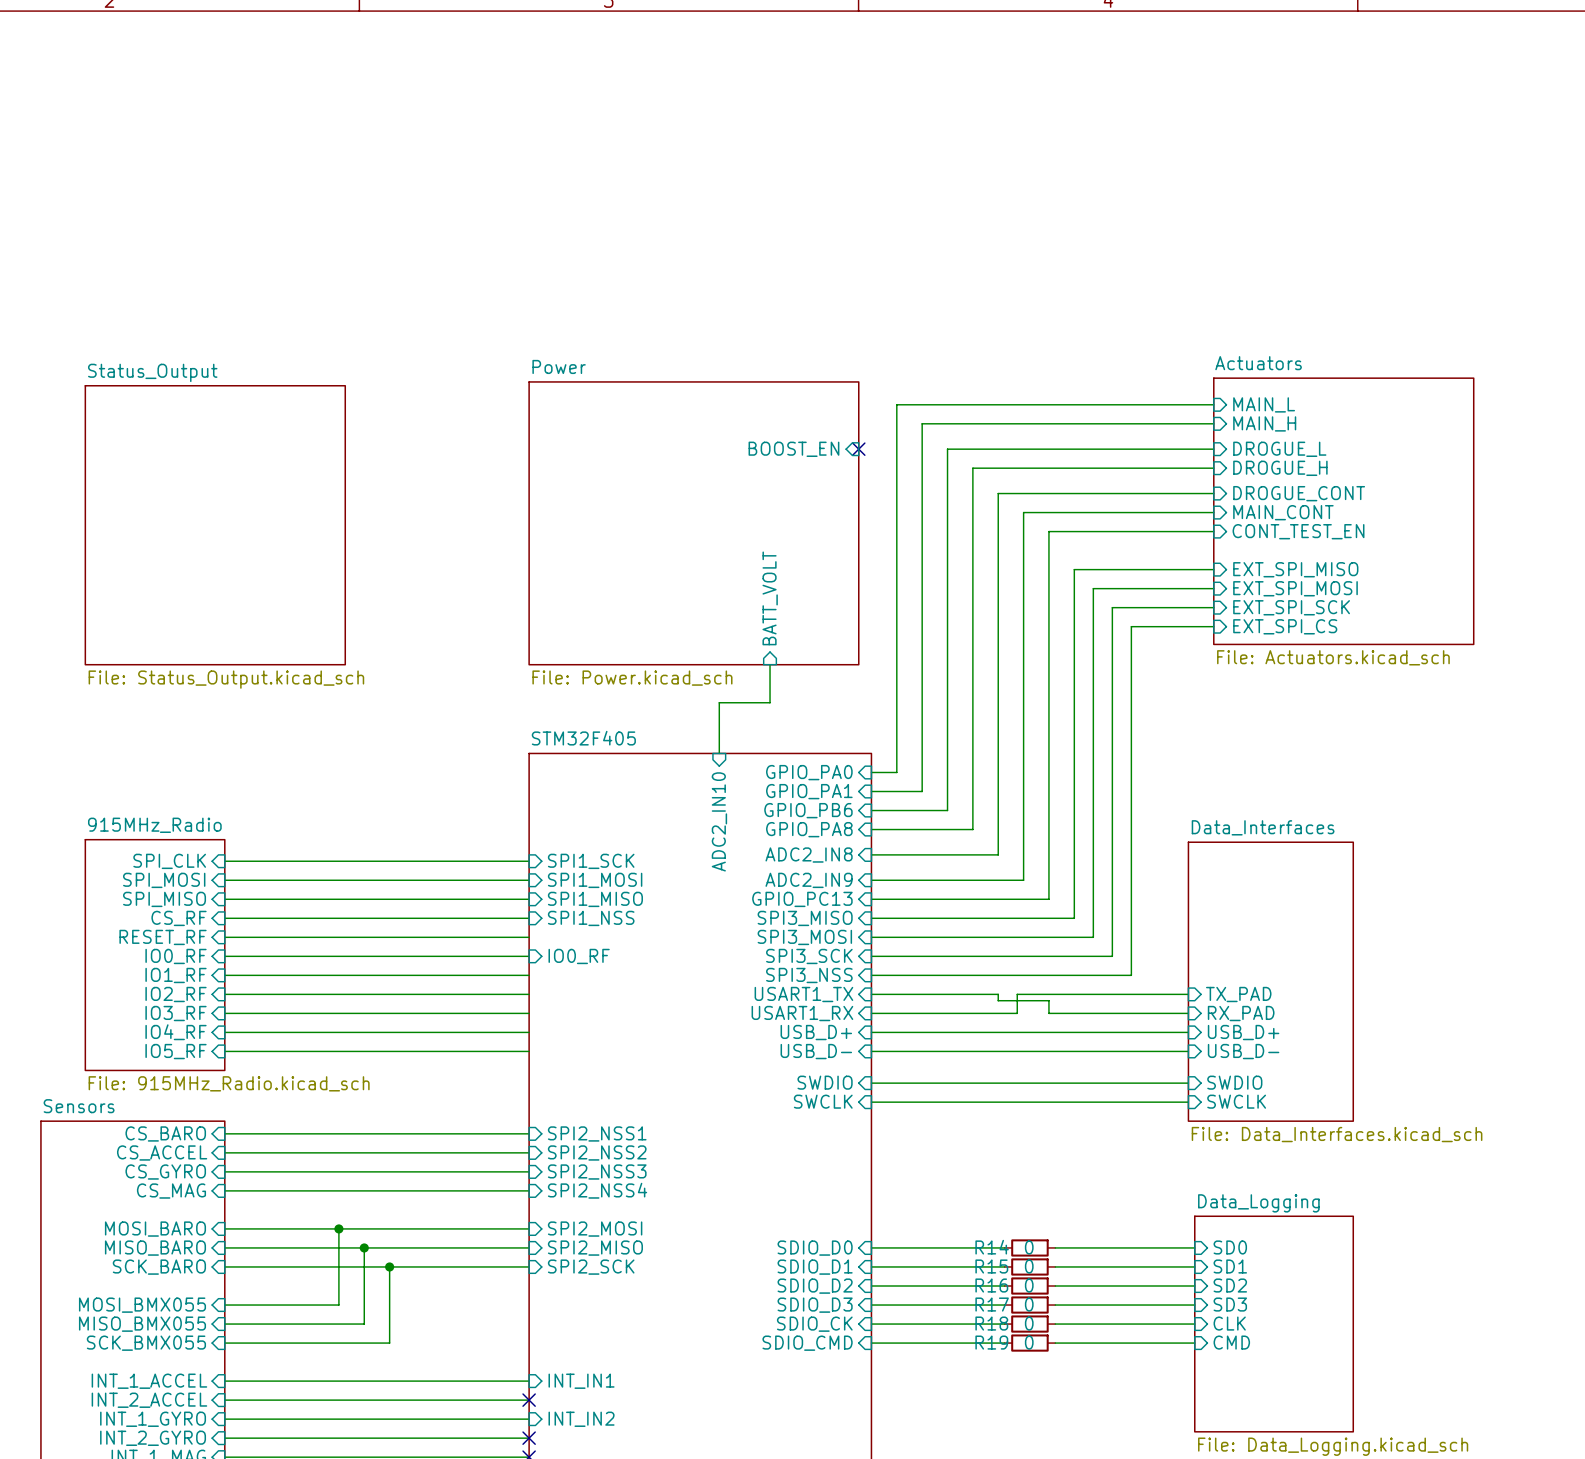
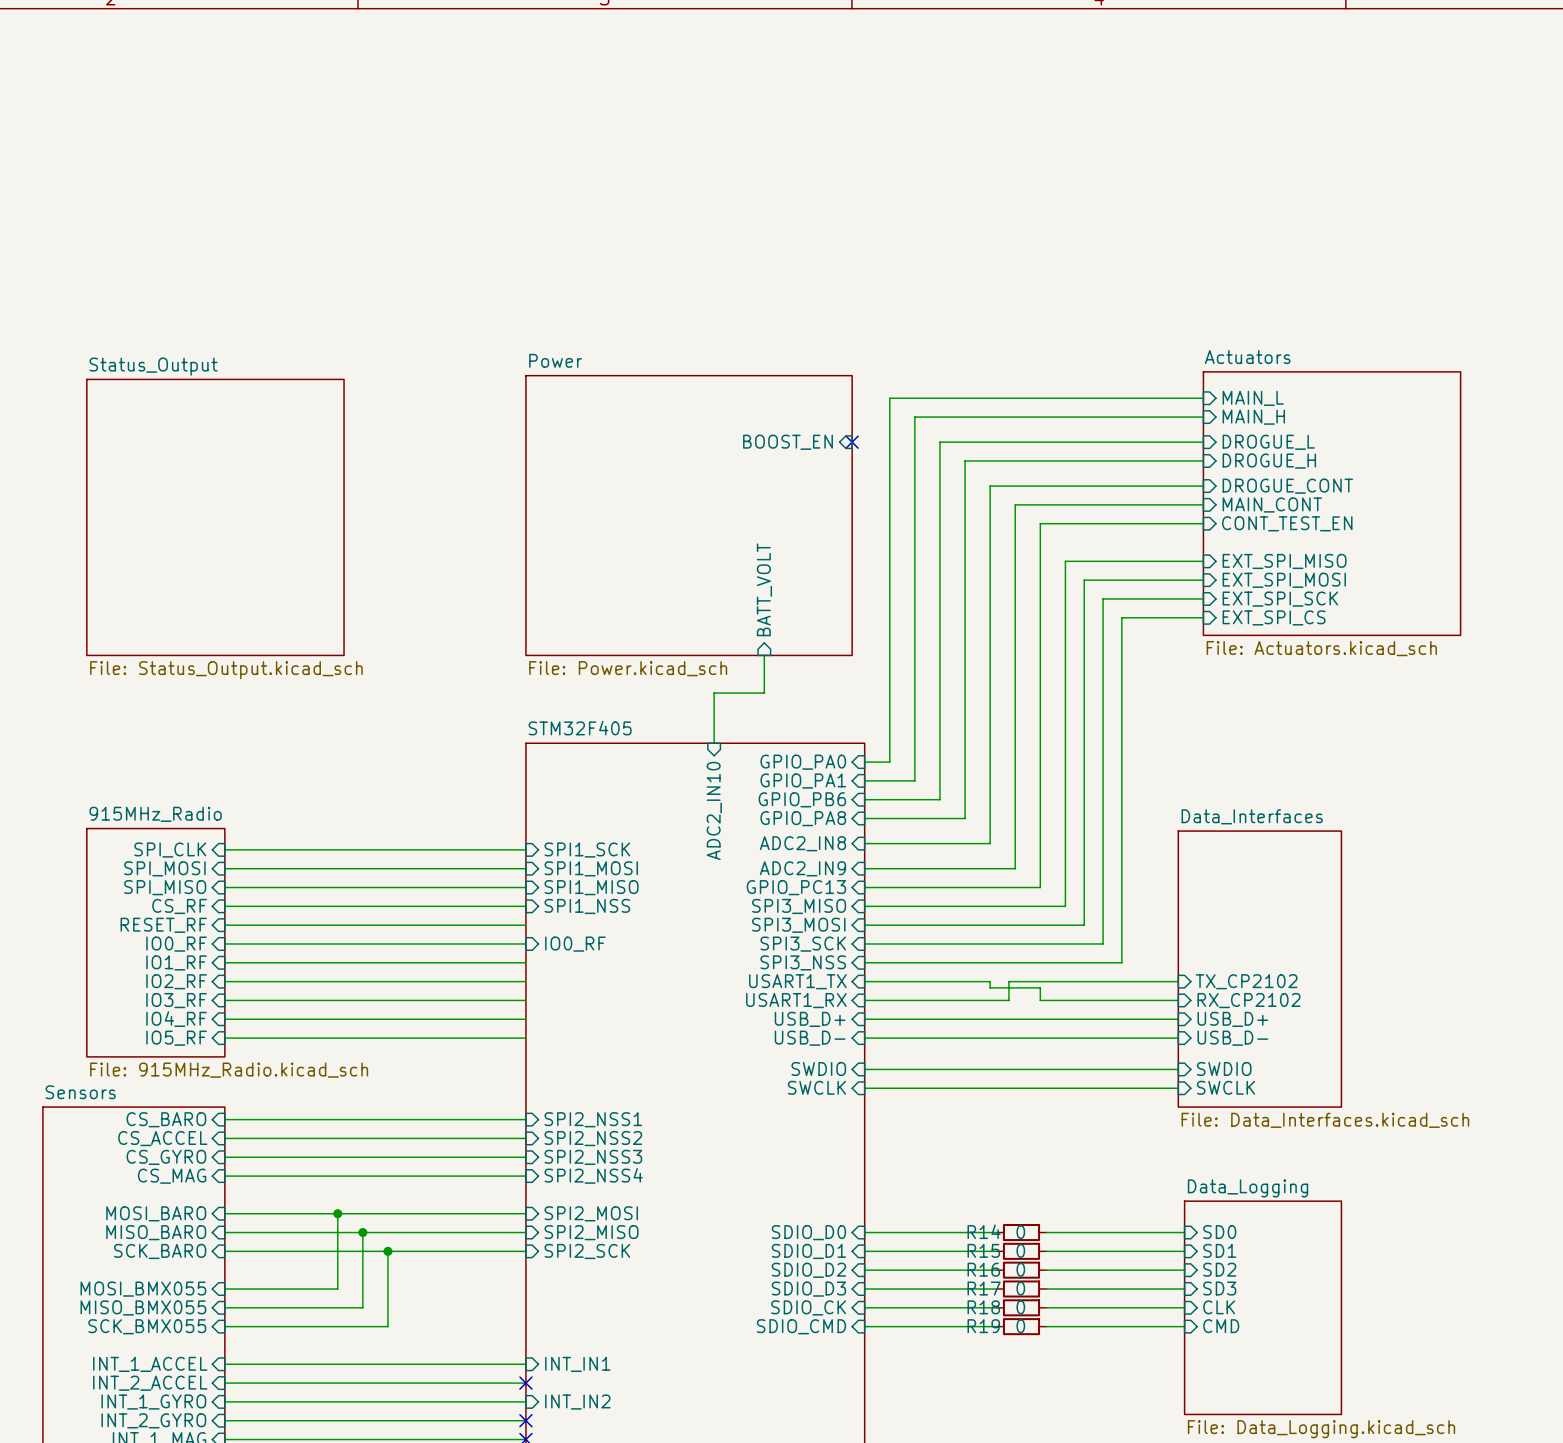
sheet pin: TX_PAD (1238, 994) -> TX_CP2102 (1246, 981)
sheet pin: RX_PAD (1241, 1013) -> RX_CP2102 (1249, 1000)

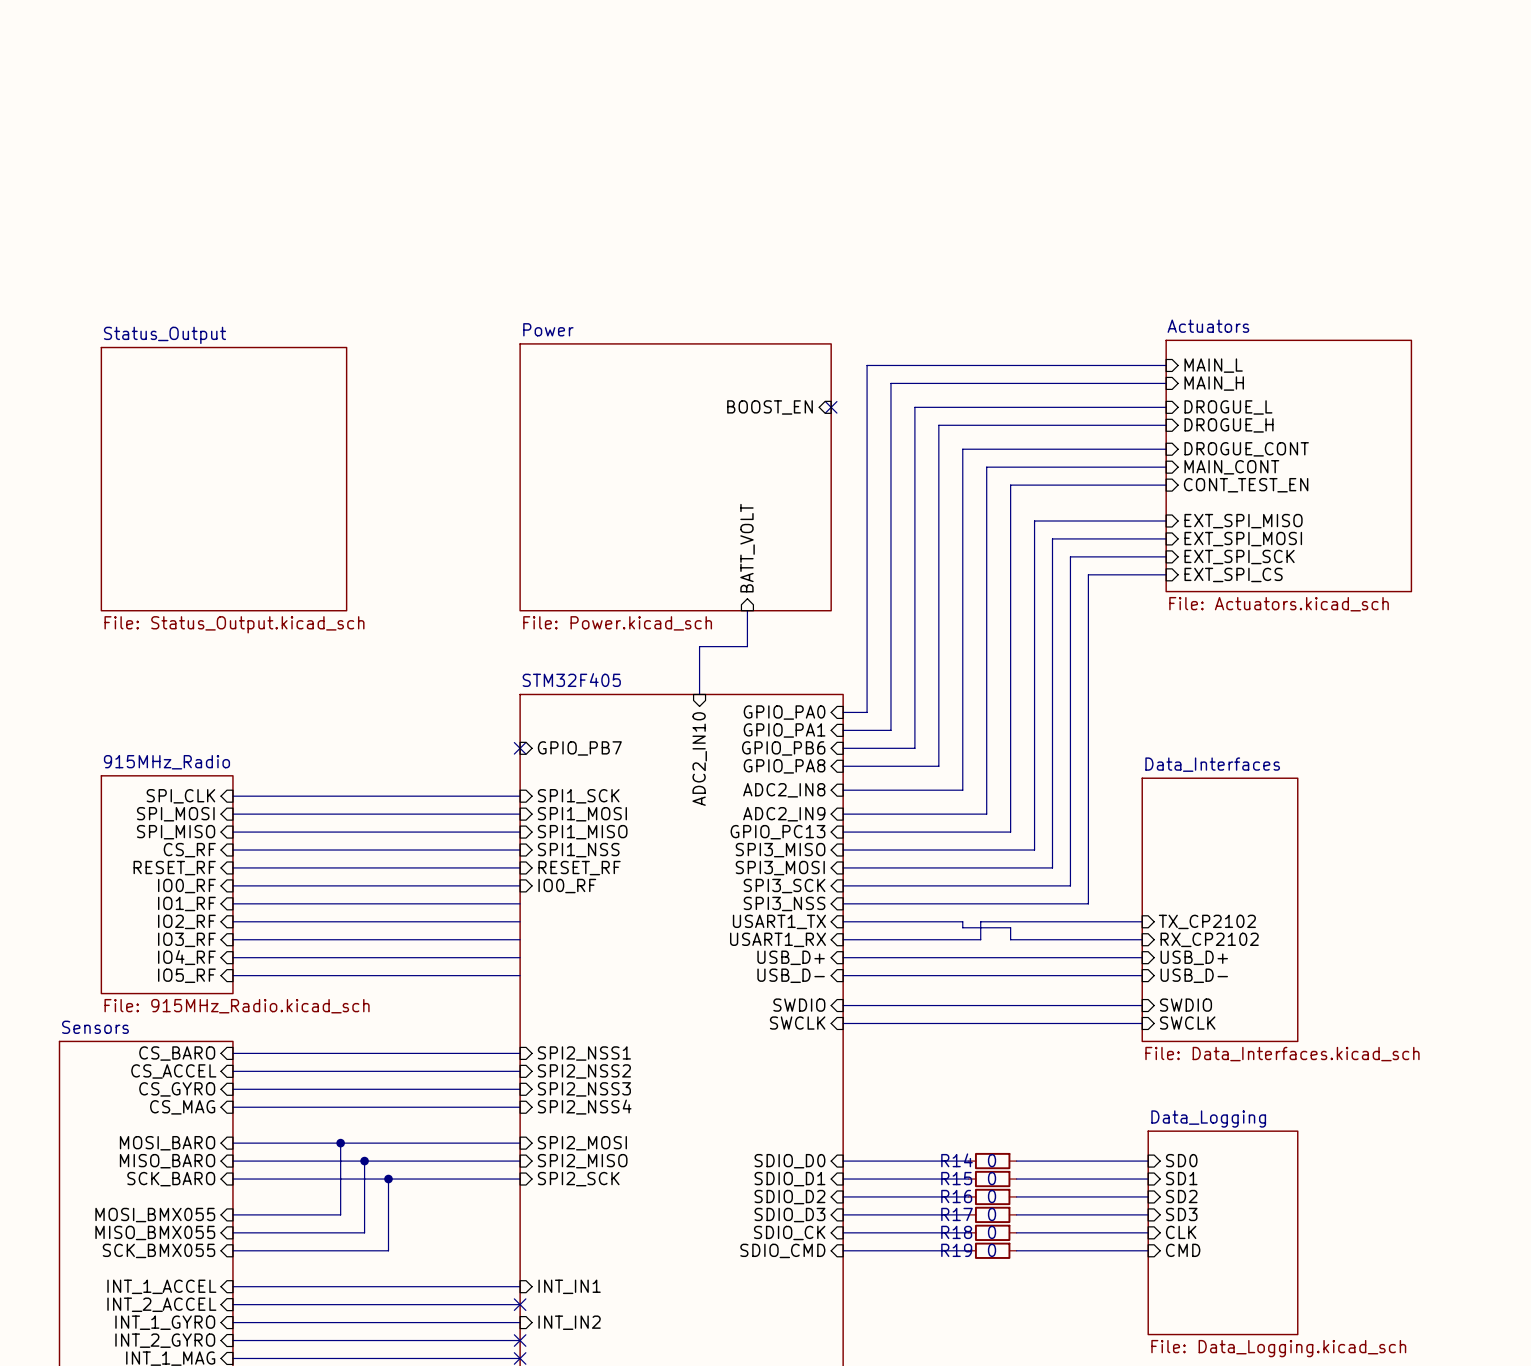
no-connect mark: none -> (520, 748)
sheet pin: none -> GPIO_PB7 (579, 748)
sheet pin: none -> RESET_RF (579, 868)

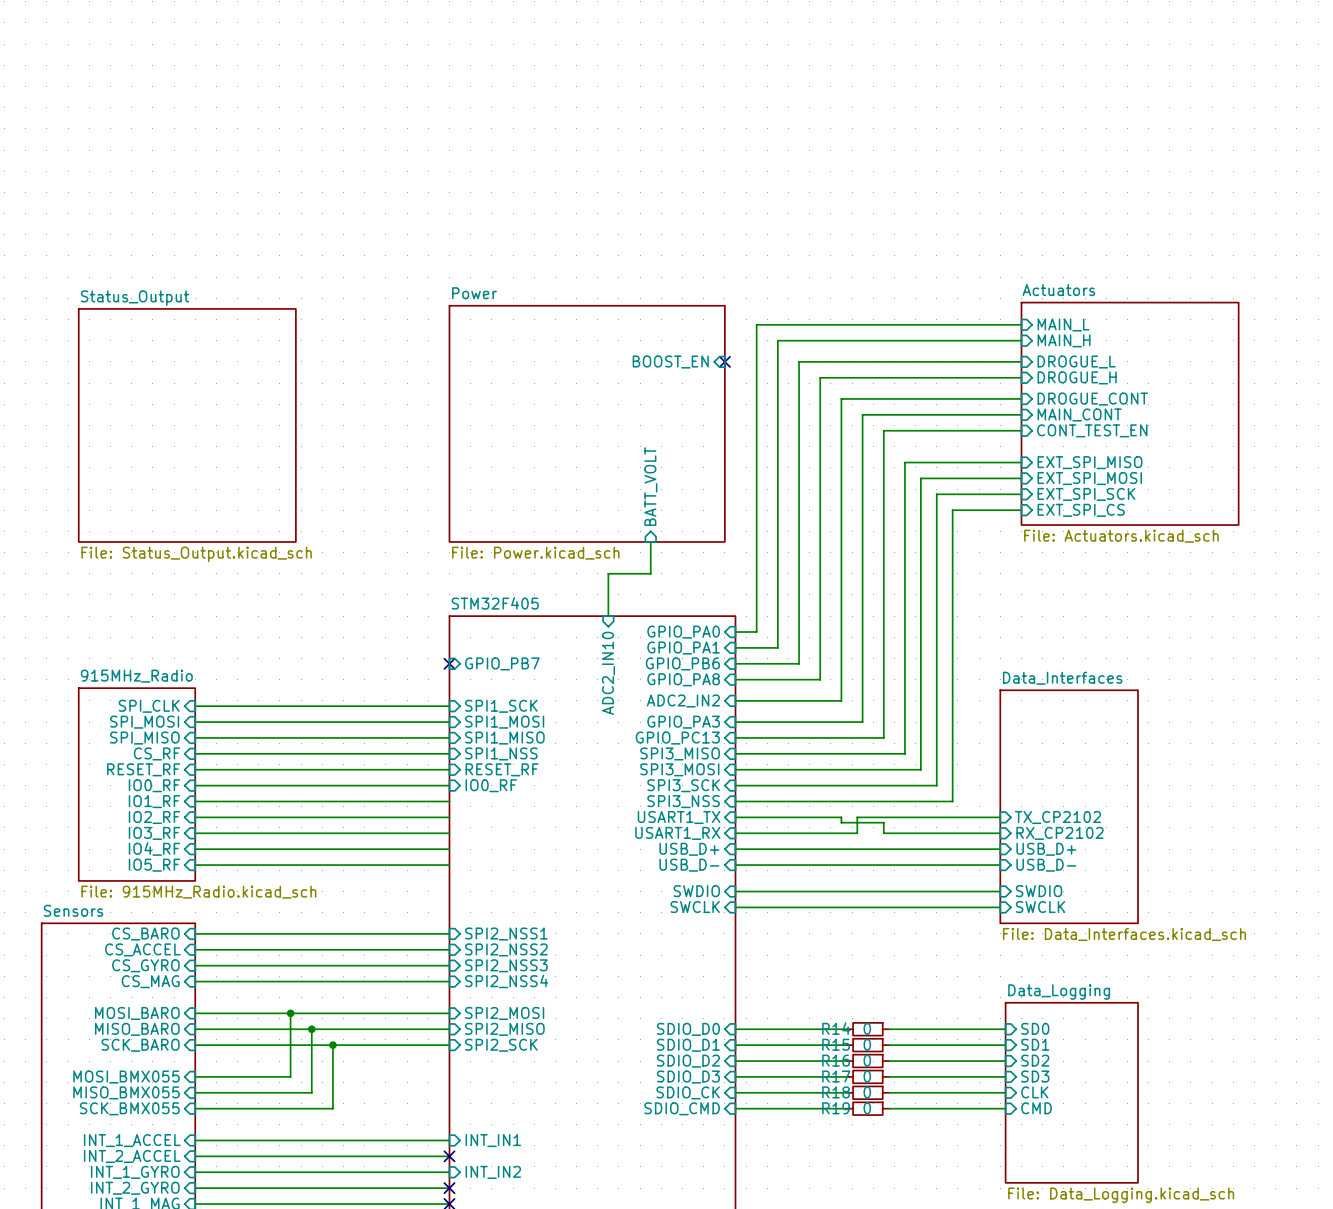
sheet pin: ADC2_IN8 (784, 790) -> ADC2_IN2 (683, 700)
sheet pin: ADC2_IN9 (784, 814) -> GPIO_PA3 (683, 722)

